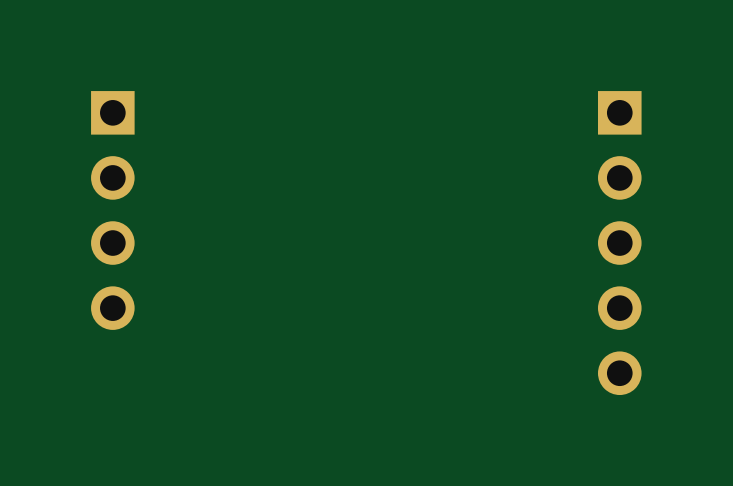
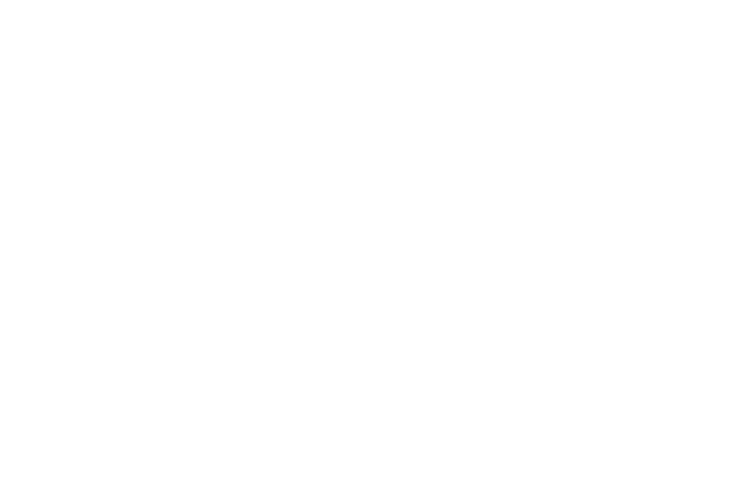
part: (112, 210) -> none
part: (619, 243) -> none

